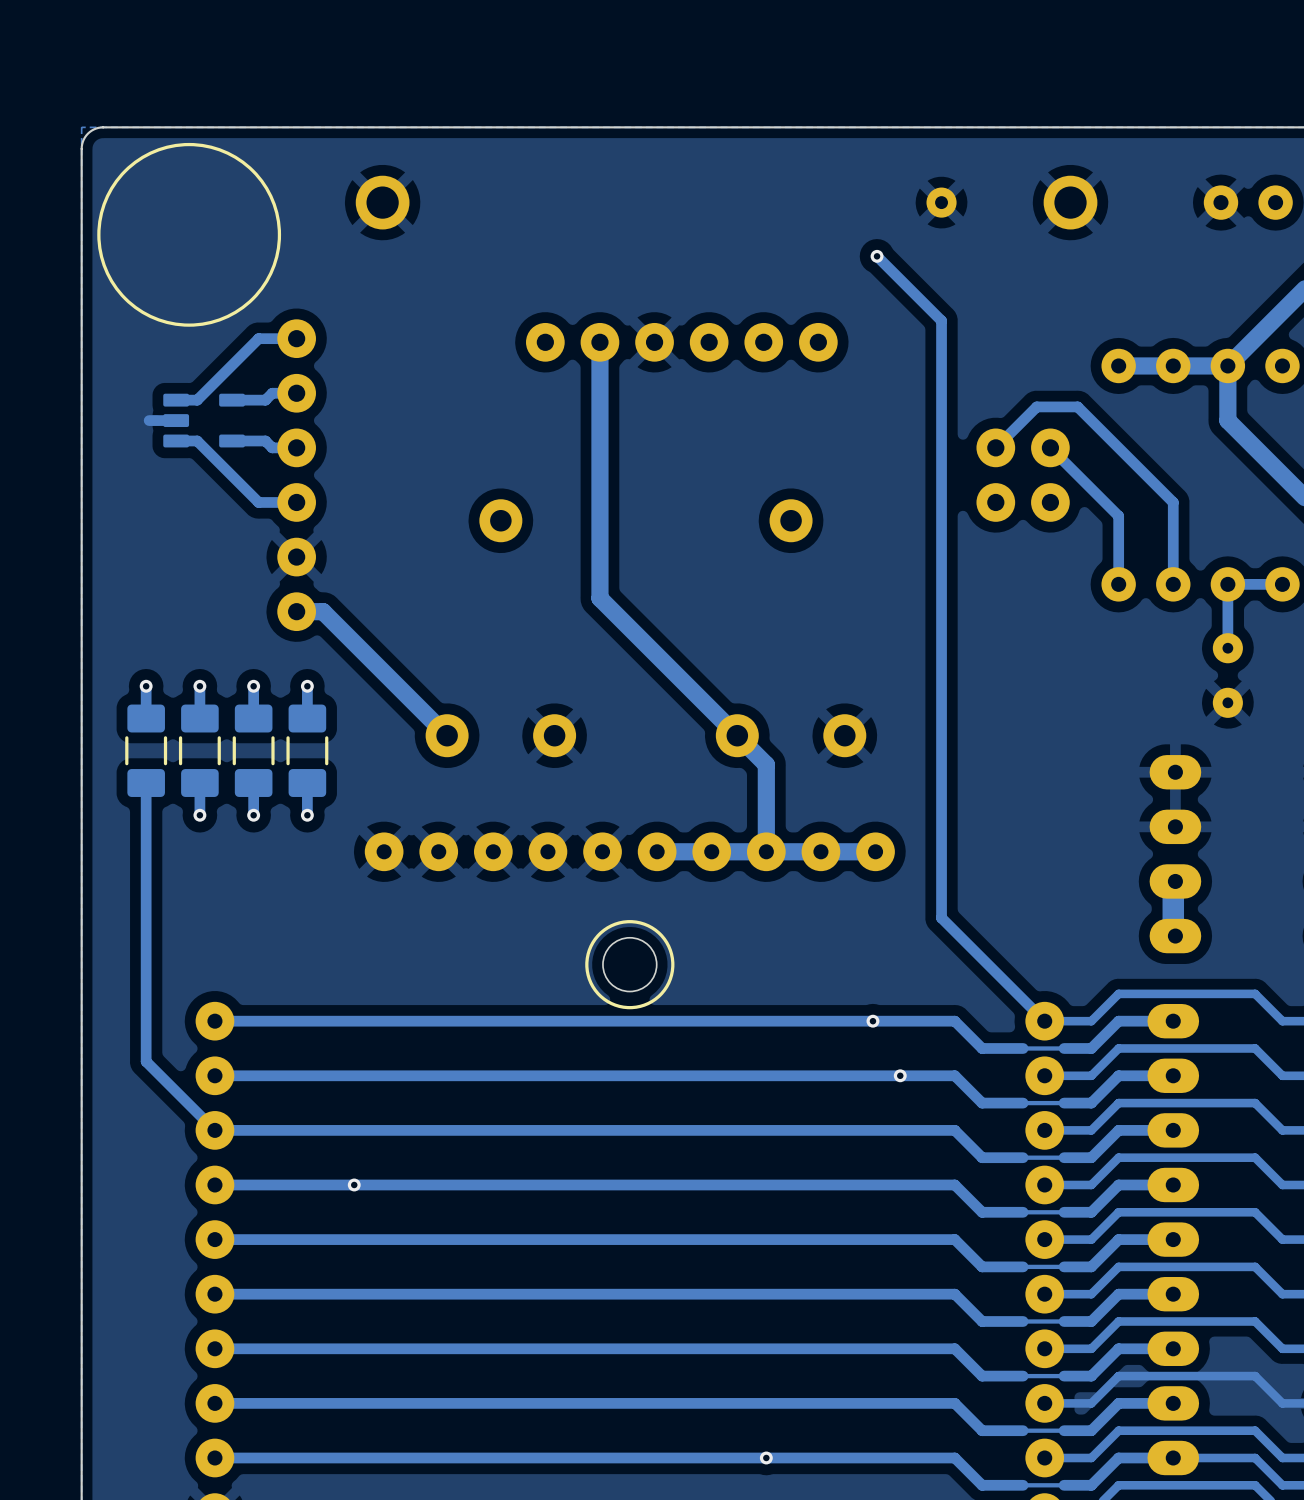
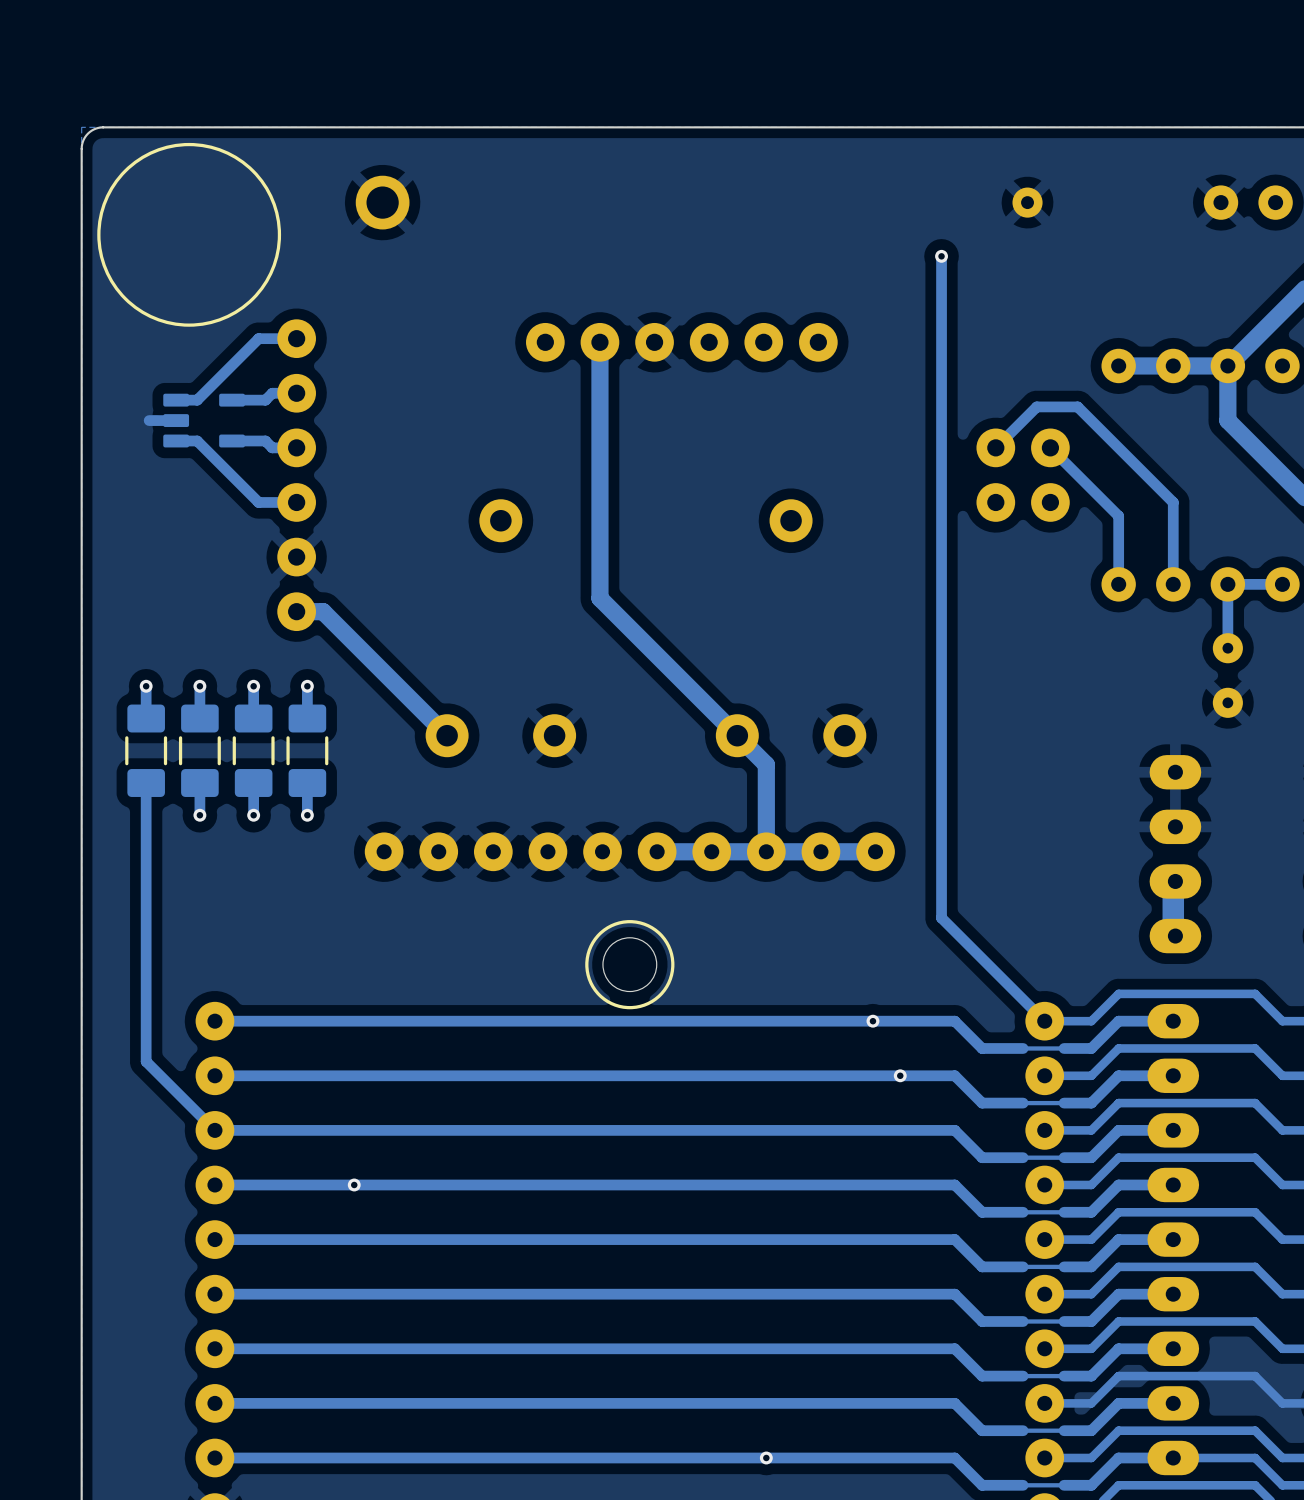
part position: (941, 202) -> (1027, 202)
part: (1070, 202) -> none
track: (877, 256) (941, 320) -> (941, 256) (941, 320)
via position: (877, 256) -> (941, 256)

